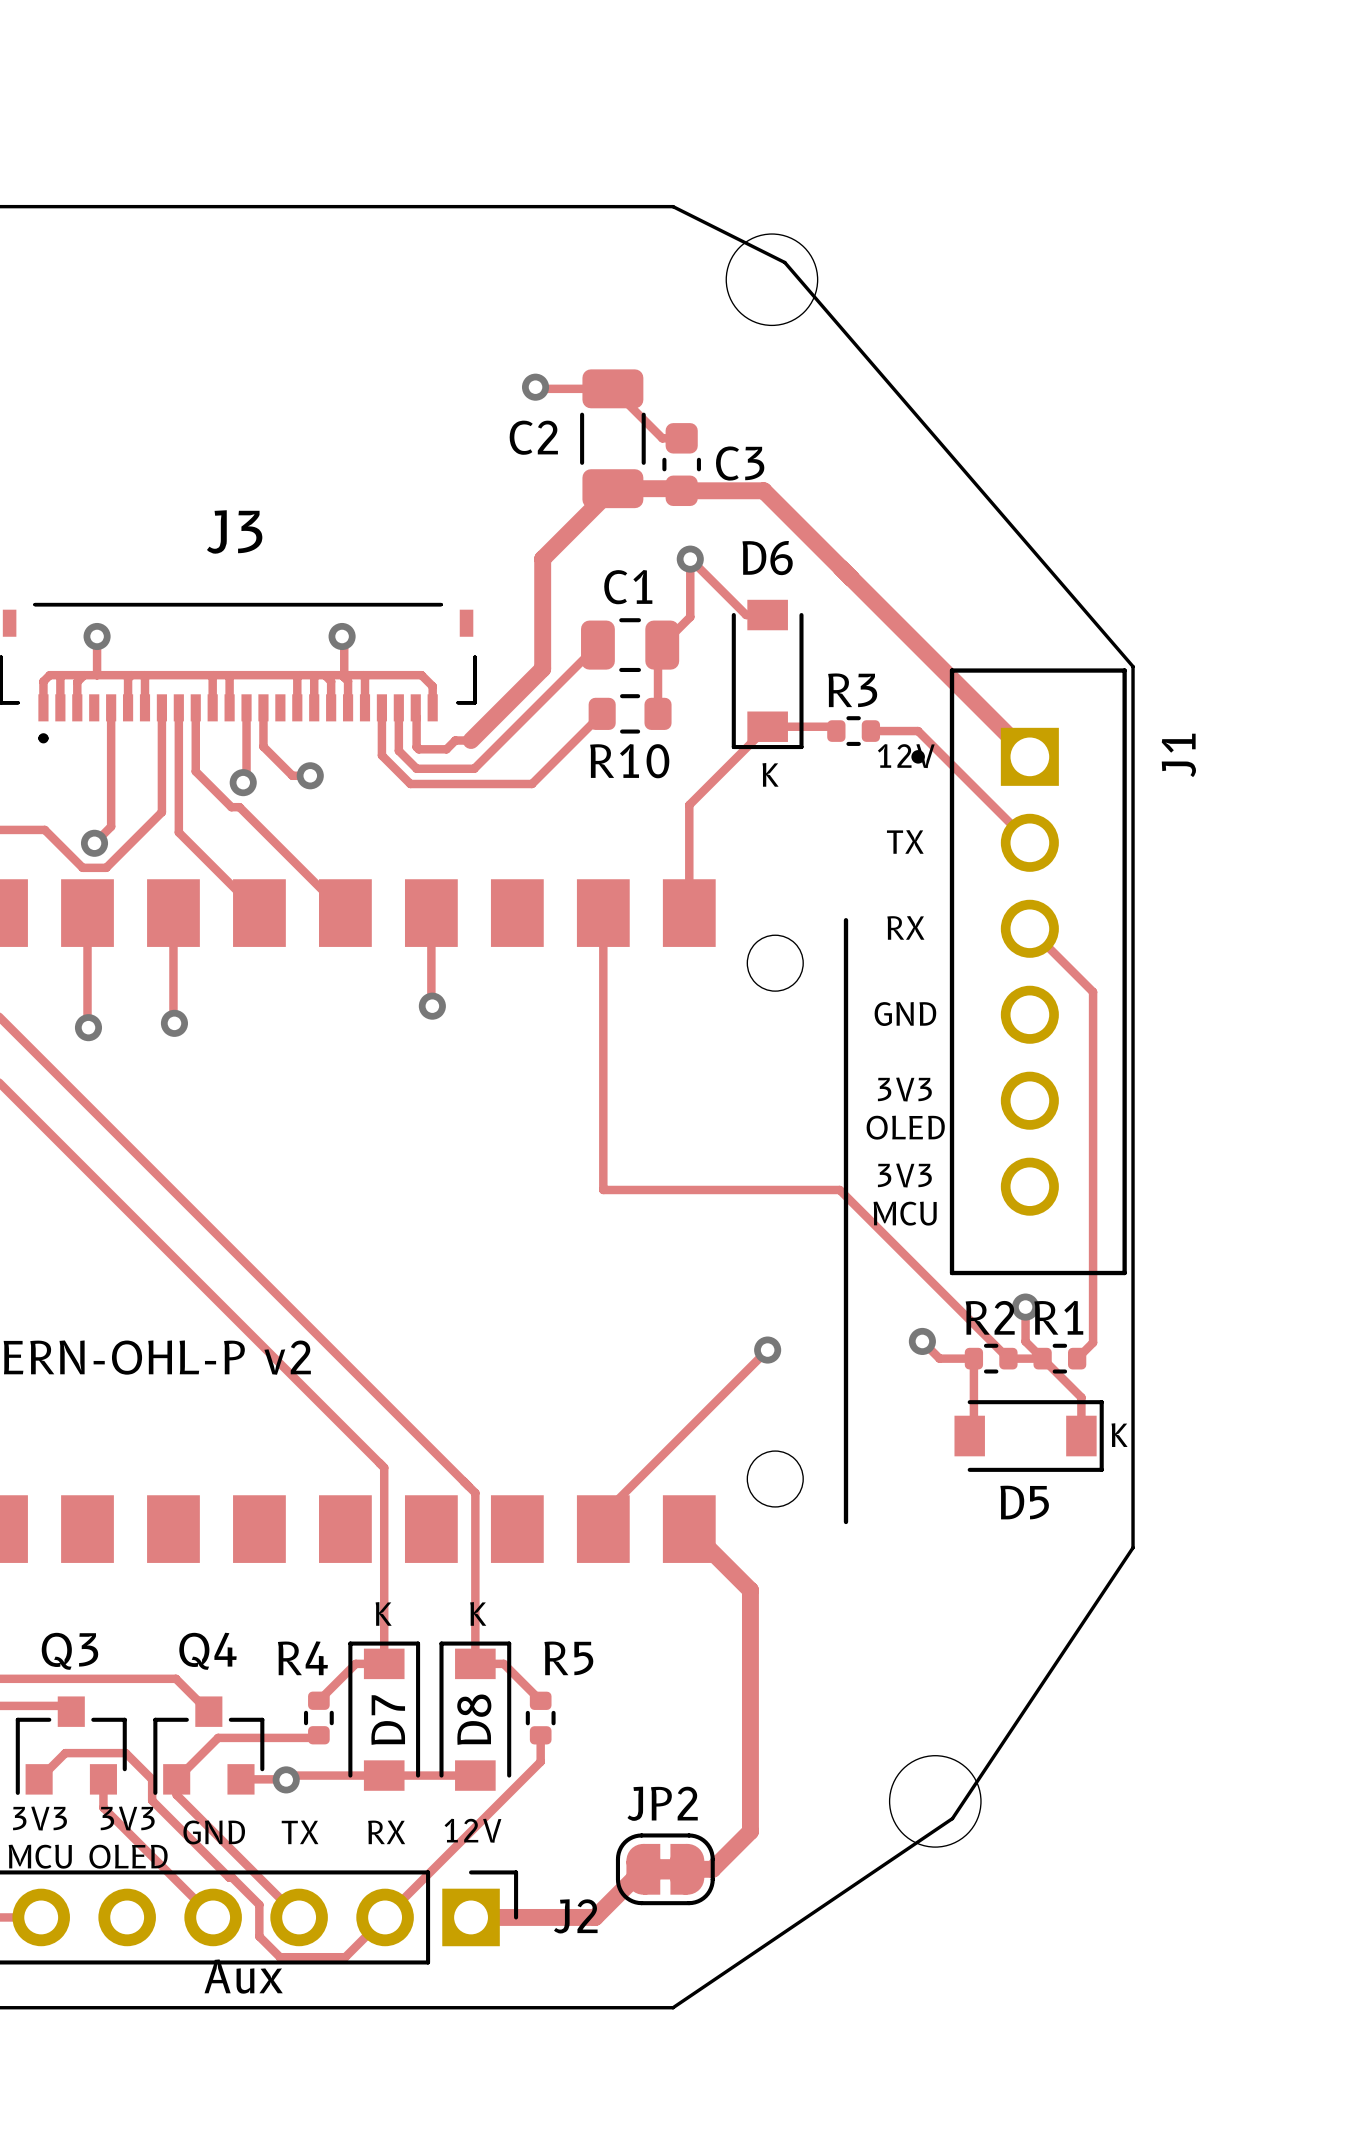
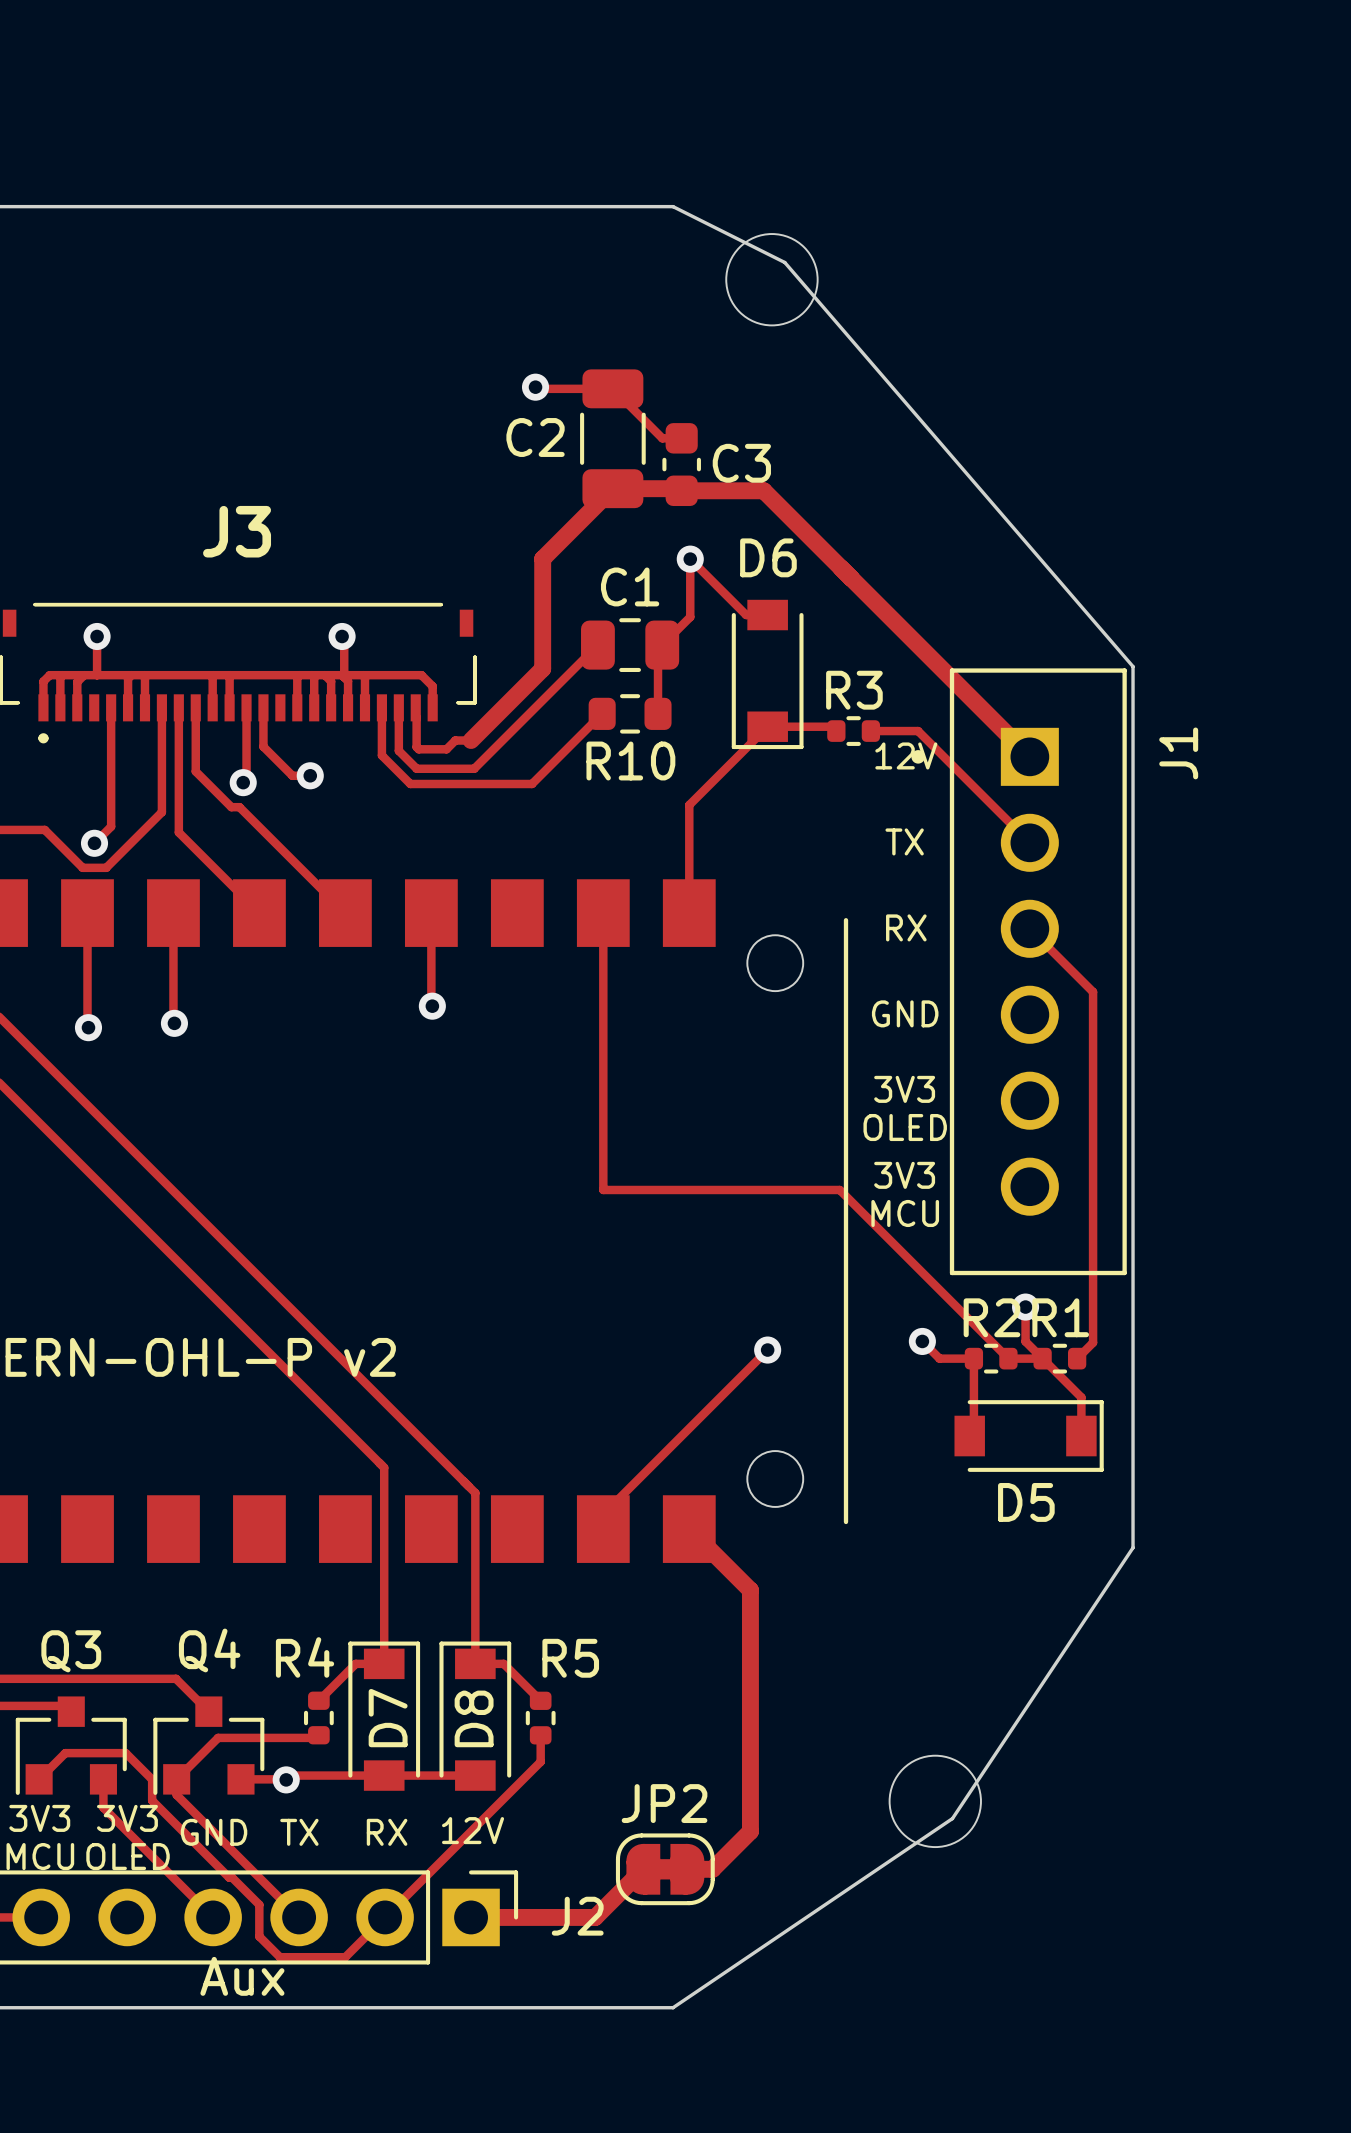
text: K (770, 774) -> none
text: K (1119, 1435) -> none
text: K (383, 1613) -> none
text: K (478, 1613) -> none

